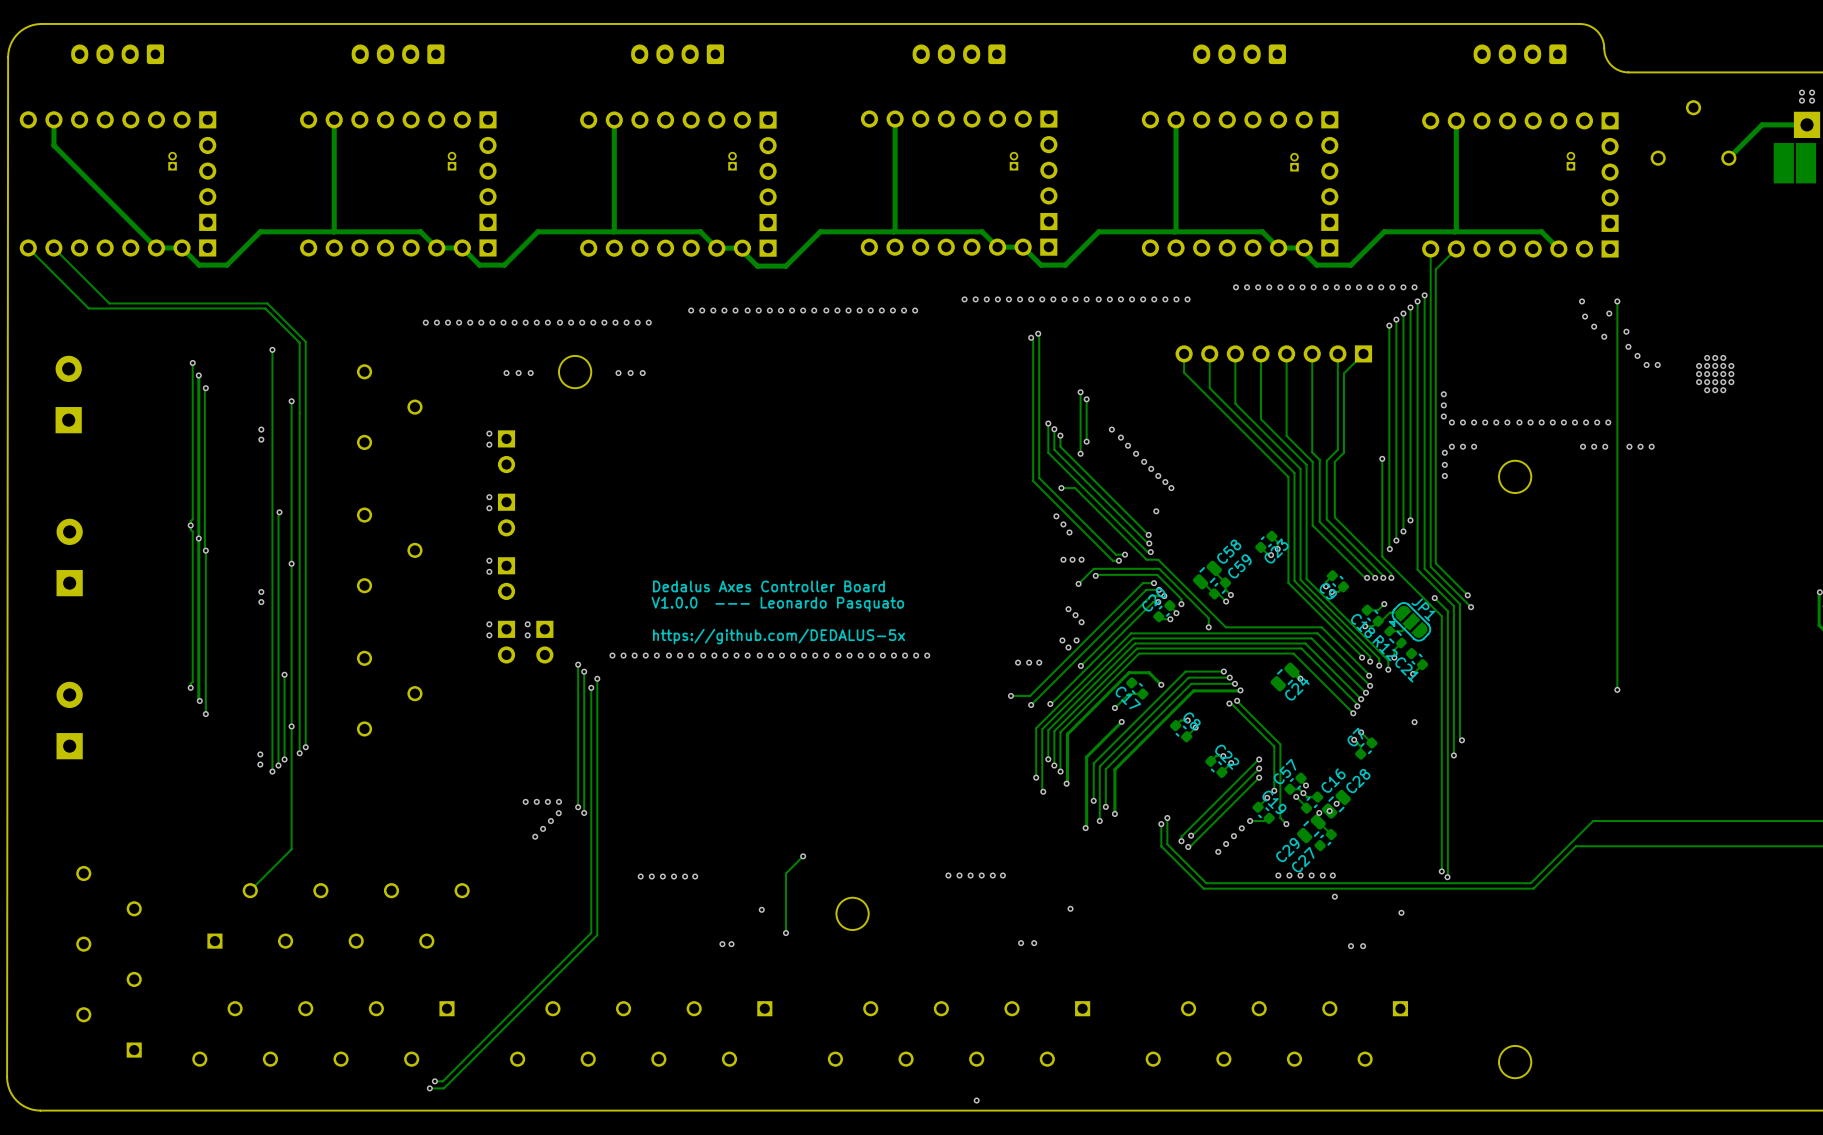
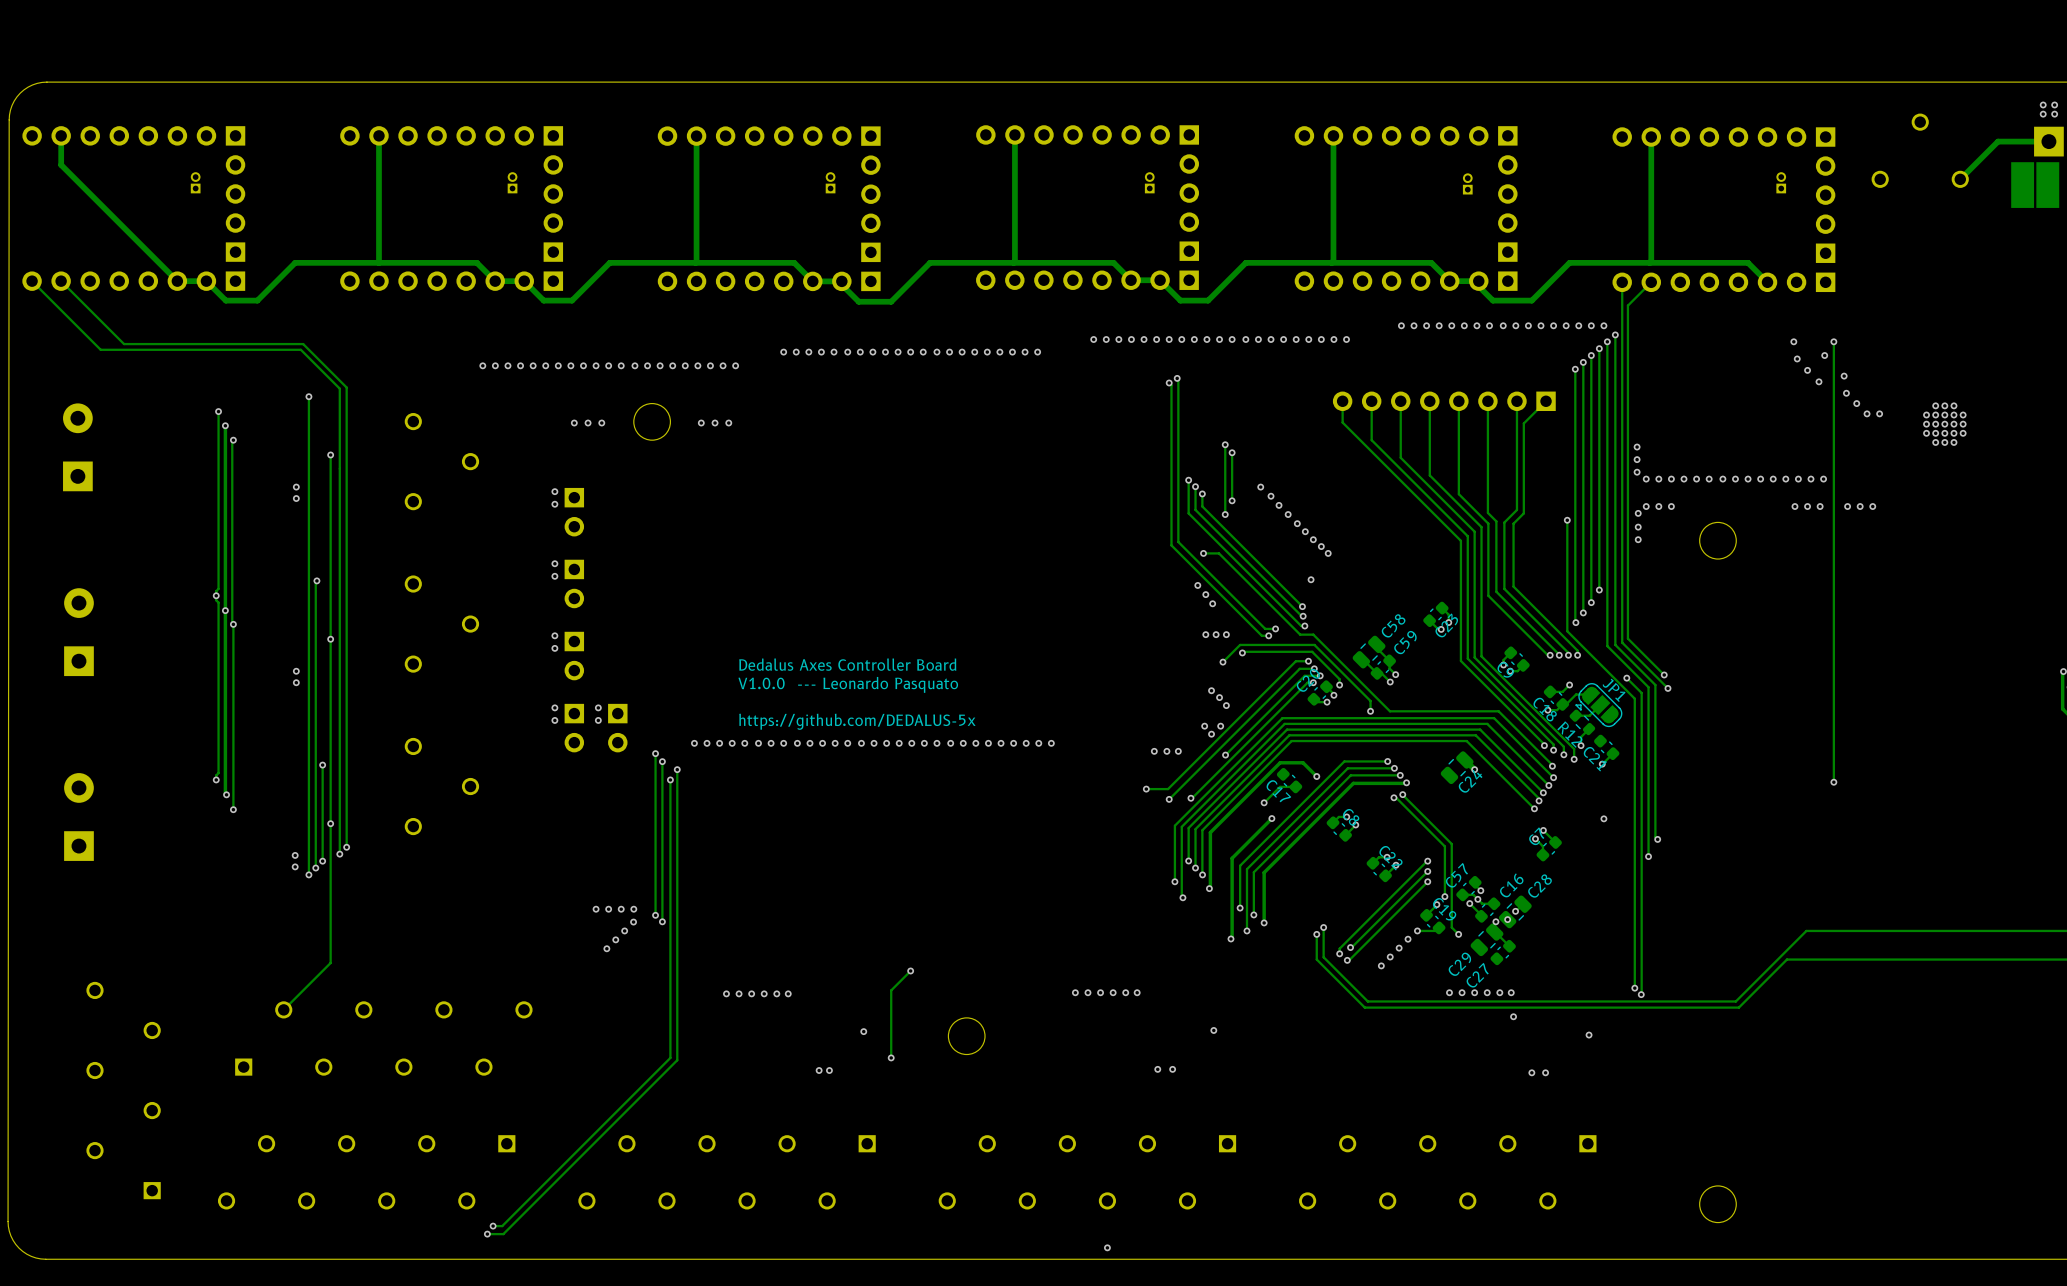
part: (117, 54) -> none
part: (398, 54) -> none
part: (677, 54) -> none
part: (959, 54) -> none
part: (1239, 54) -> none
part: (1519, 54) -> none
board edge: (1628, 72) (1617, 70) (1609, 63) (1604, 53) (1602, 40) (1597, 31) (1590, 26) (1580, 23) (41, 23) (24, 28) (12, 40) (8, 57) (7, 1077) -> (1846, 82) (46, 82) (28, 87) (14, 100) (9, 119) (8, 1221)

